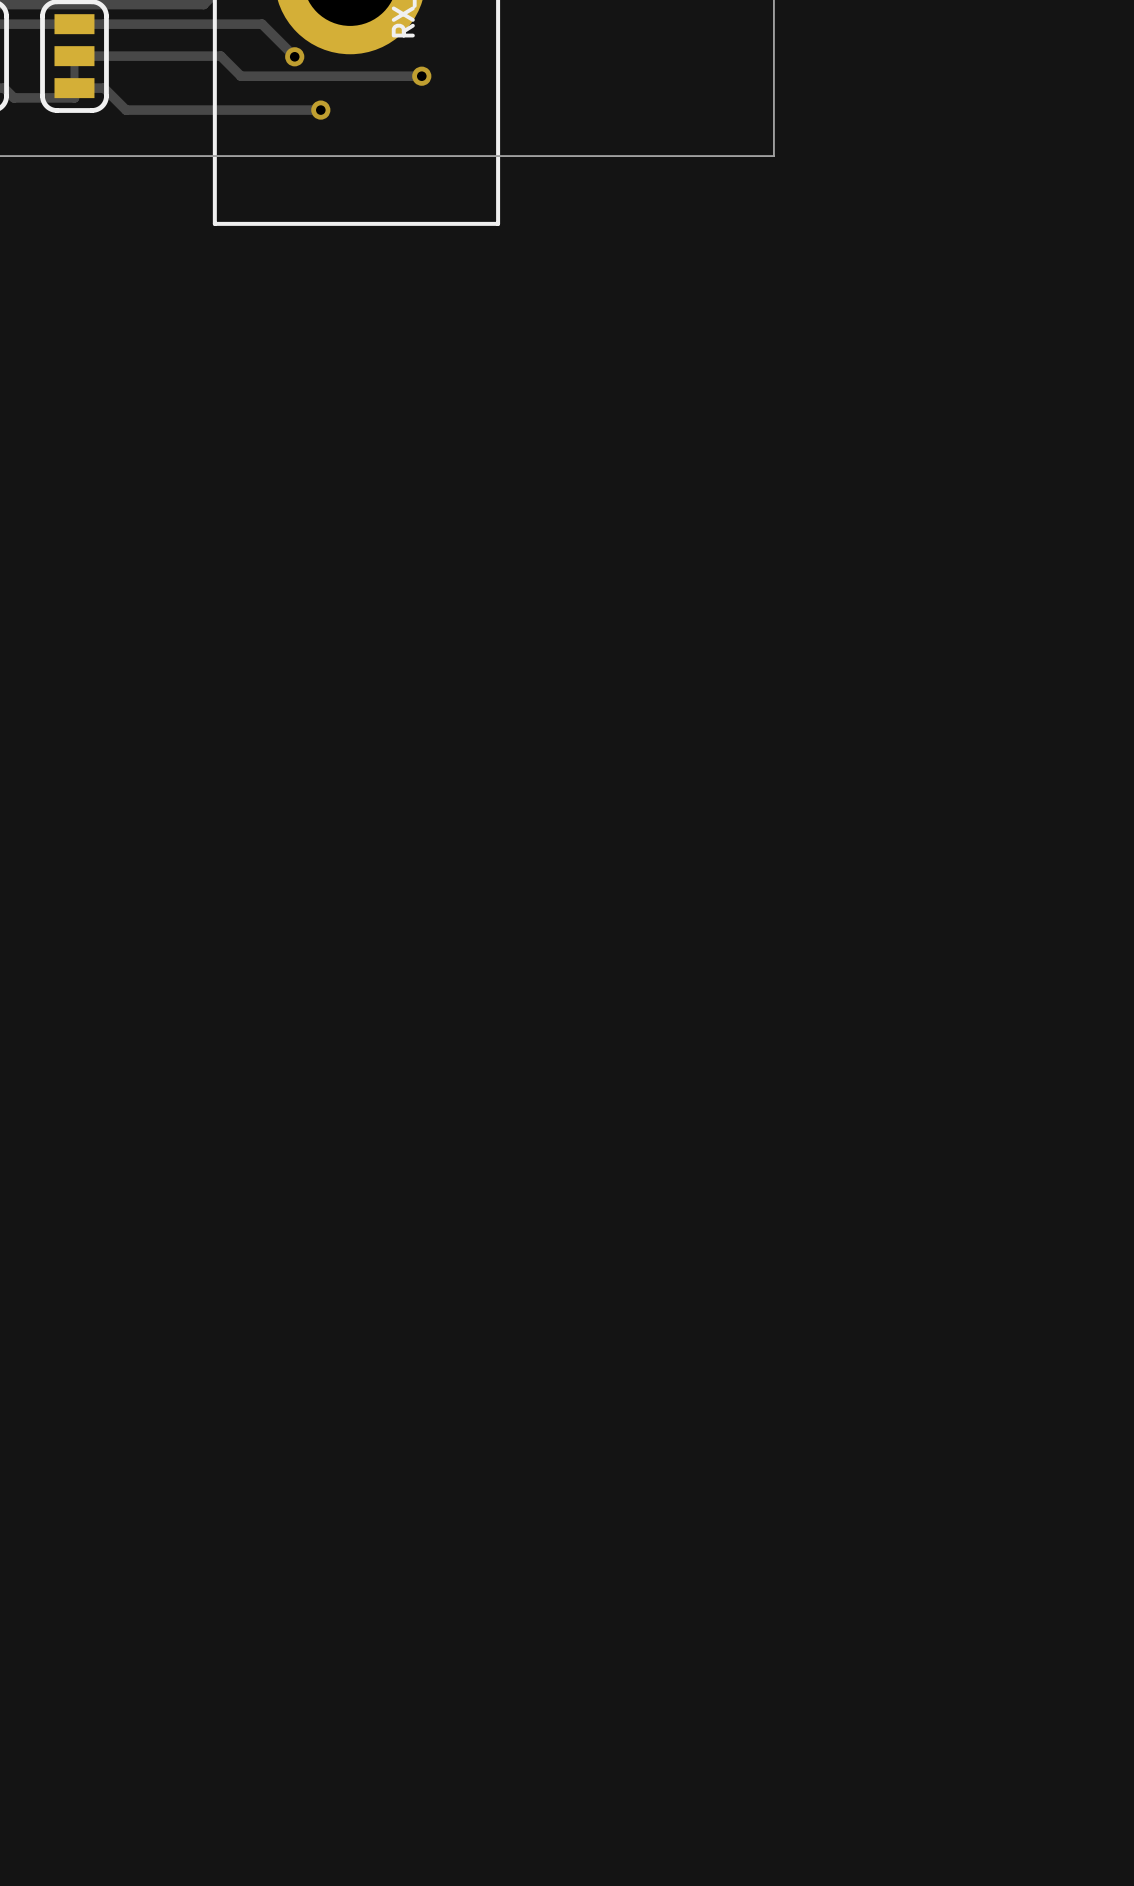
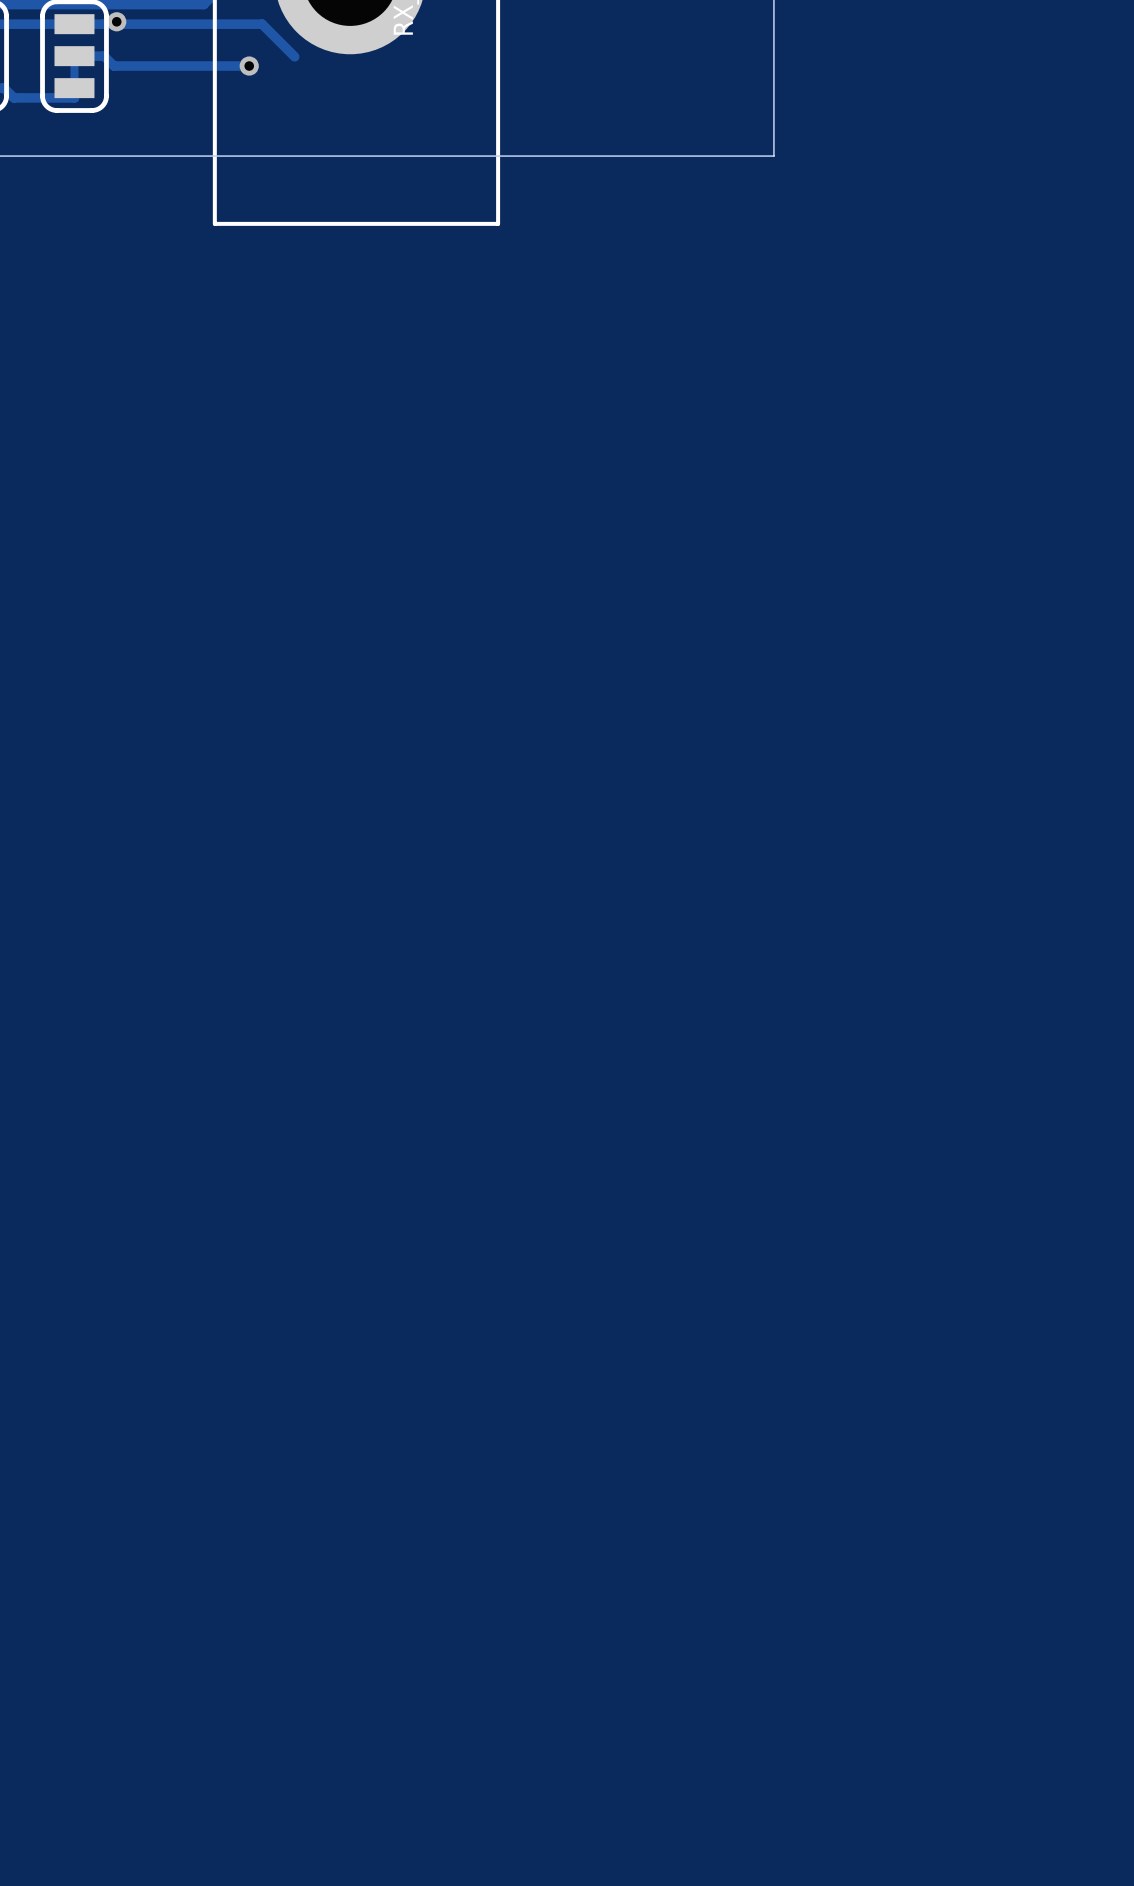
via: none -> (116, 21)
track: (104, 56) (220, 56) (240, 76) (421, 76) -> (104, 56) (113, 66) (249, 66)
via: (294, 56) -> none
via: none -> (249, 66)
via: (421, 76) -> none
track: (74, 88) (104, 88) (126, 110) (320, 110) -> none
via: (320, 110) -> none

